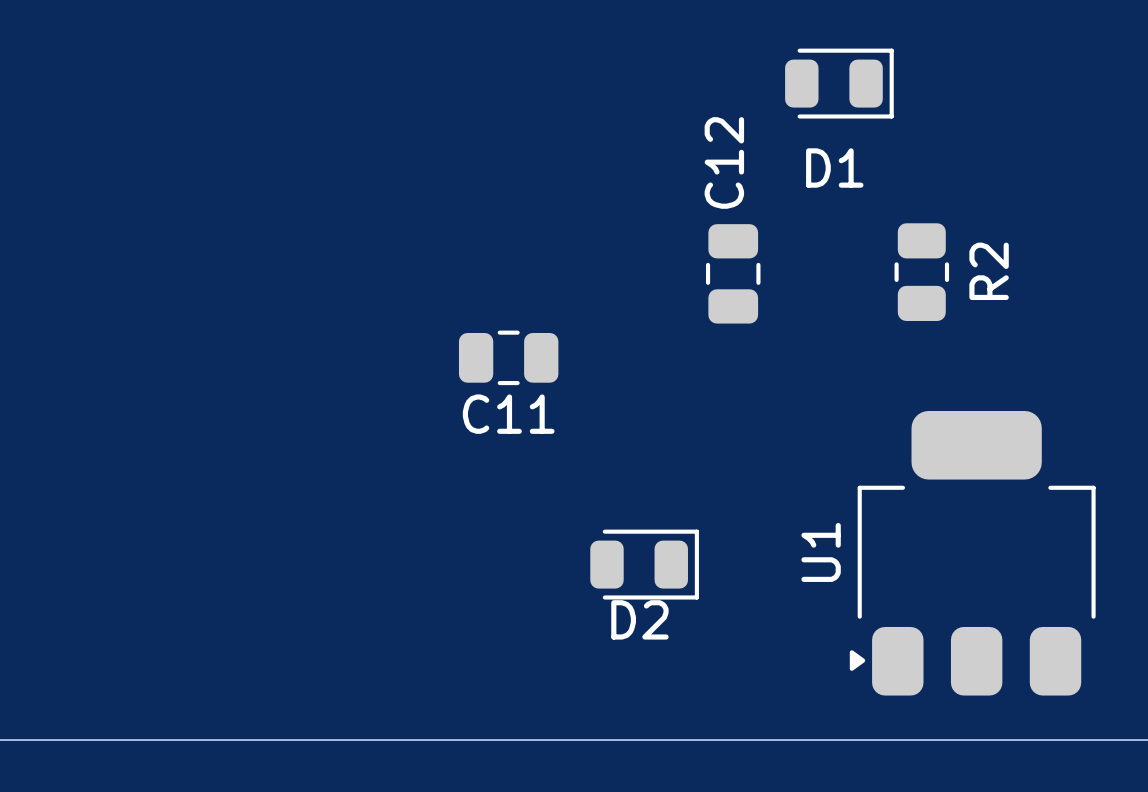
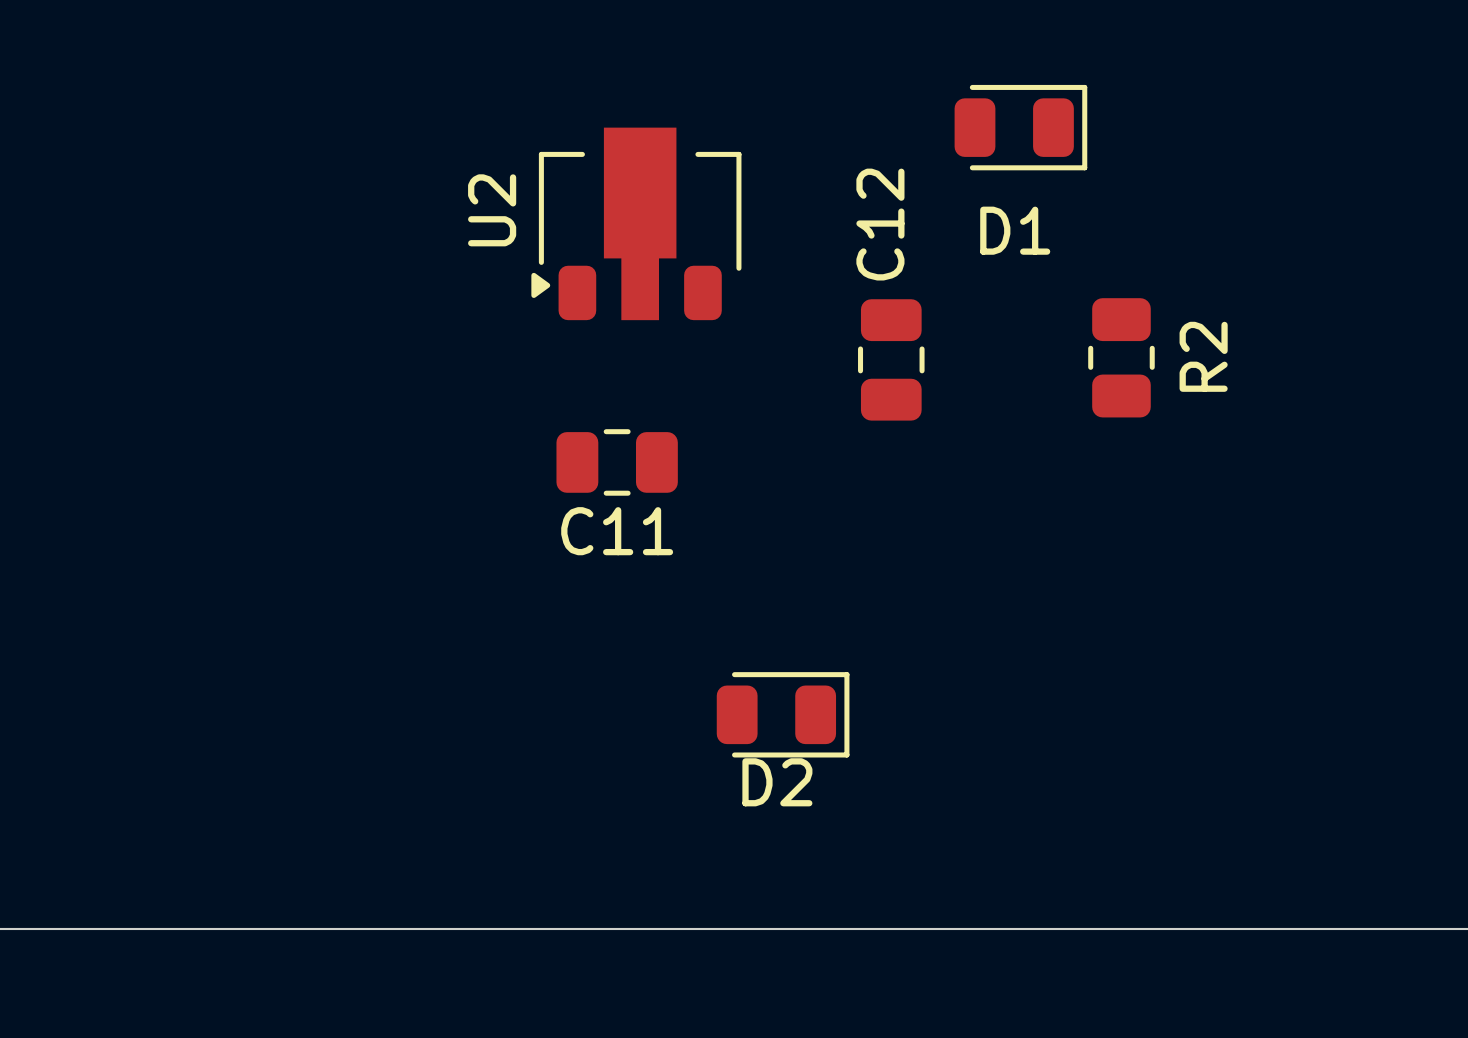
U2: none -> (636, 223)
U1: (972, 553) -> none

